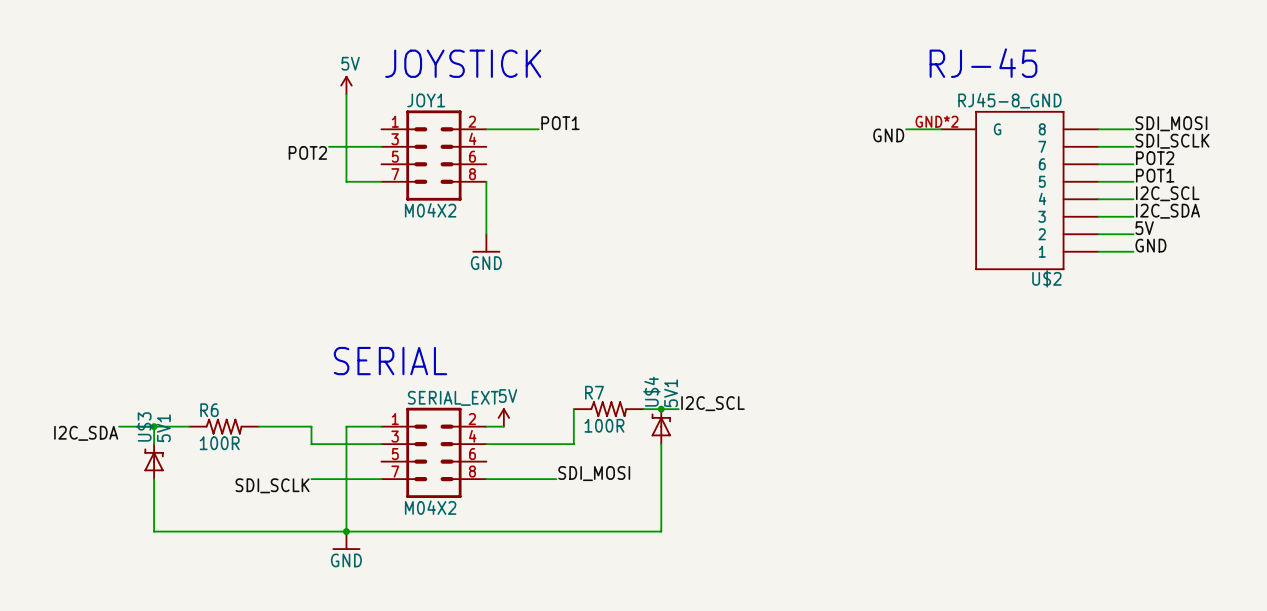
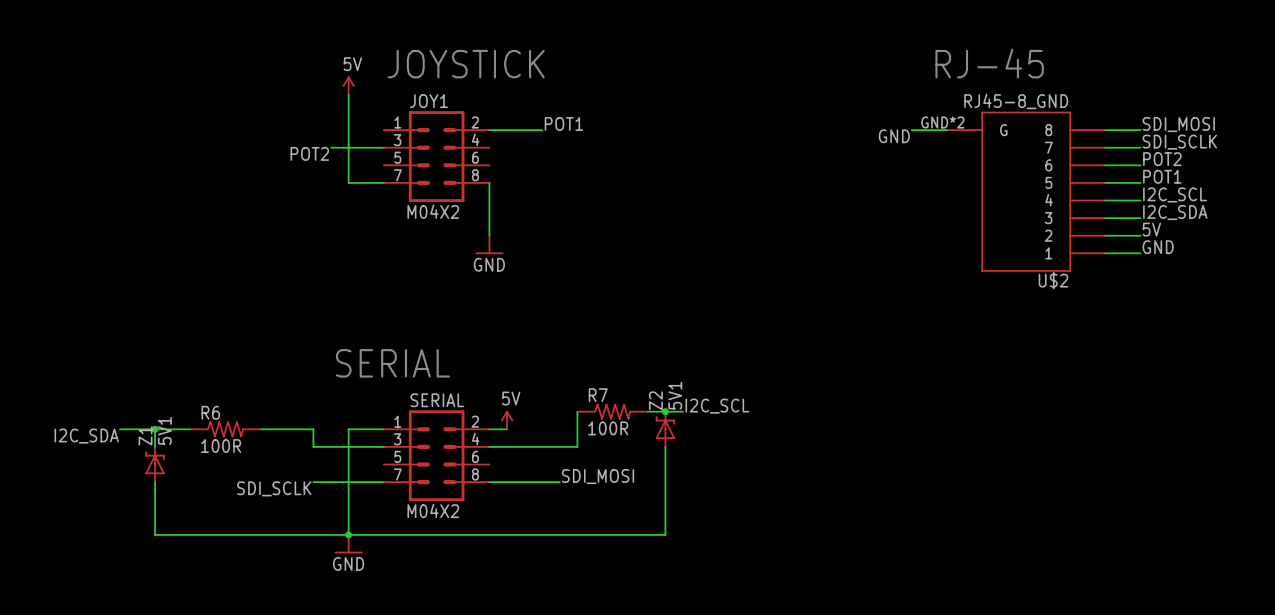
U$4 name: U$4 (651, 391) -> Z2 (655, 400)
SERIAL_EXT name: SERIAL_EXT (453, 398) -> SERIAL (437, 400)
U$3 name: U$3 (144, 426) -> Z1 (145, 435)

